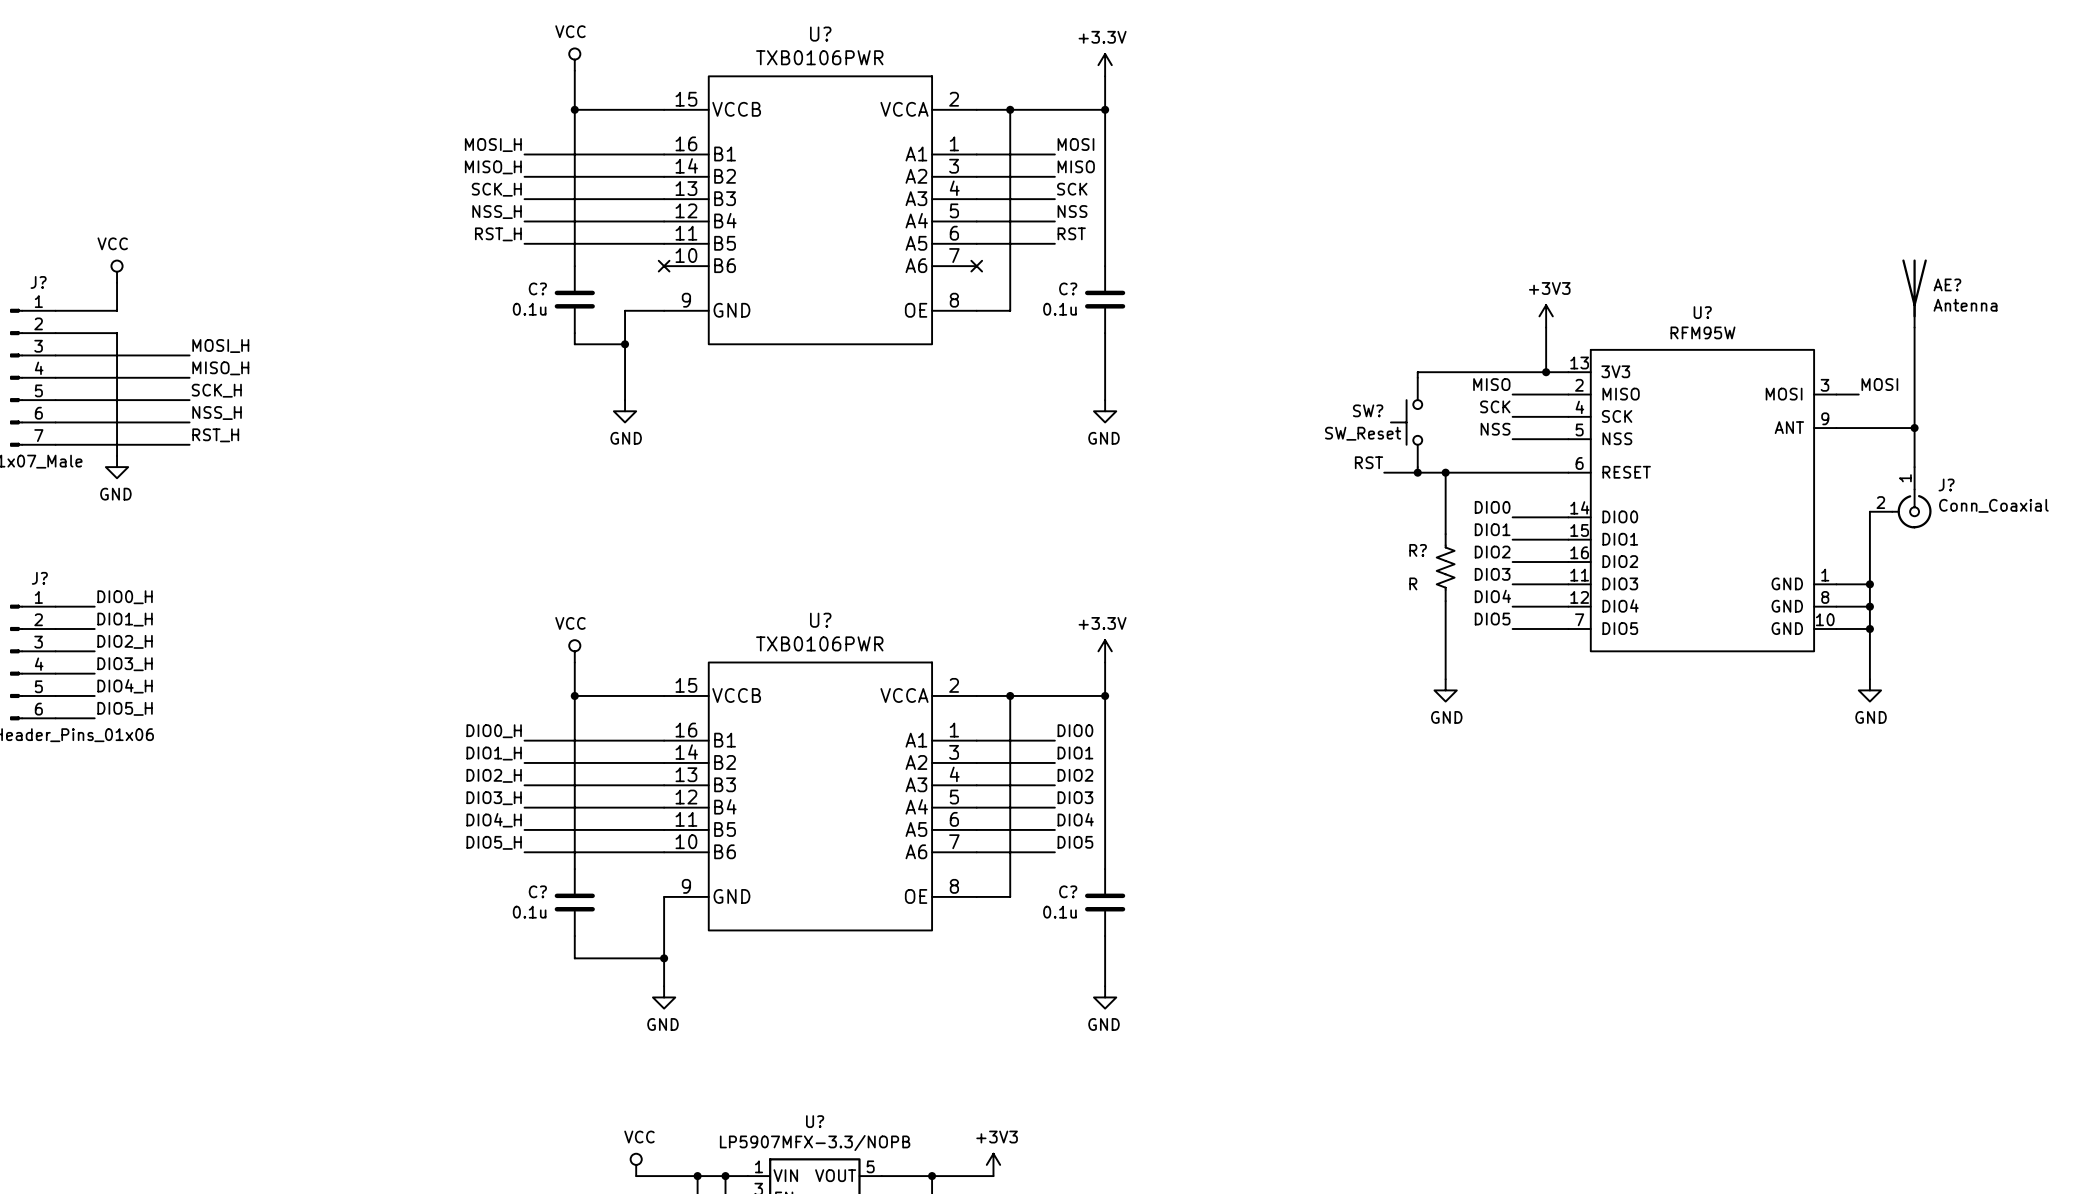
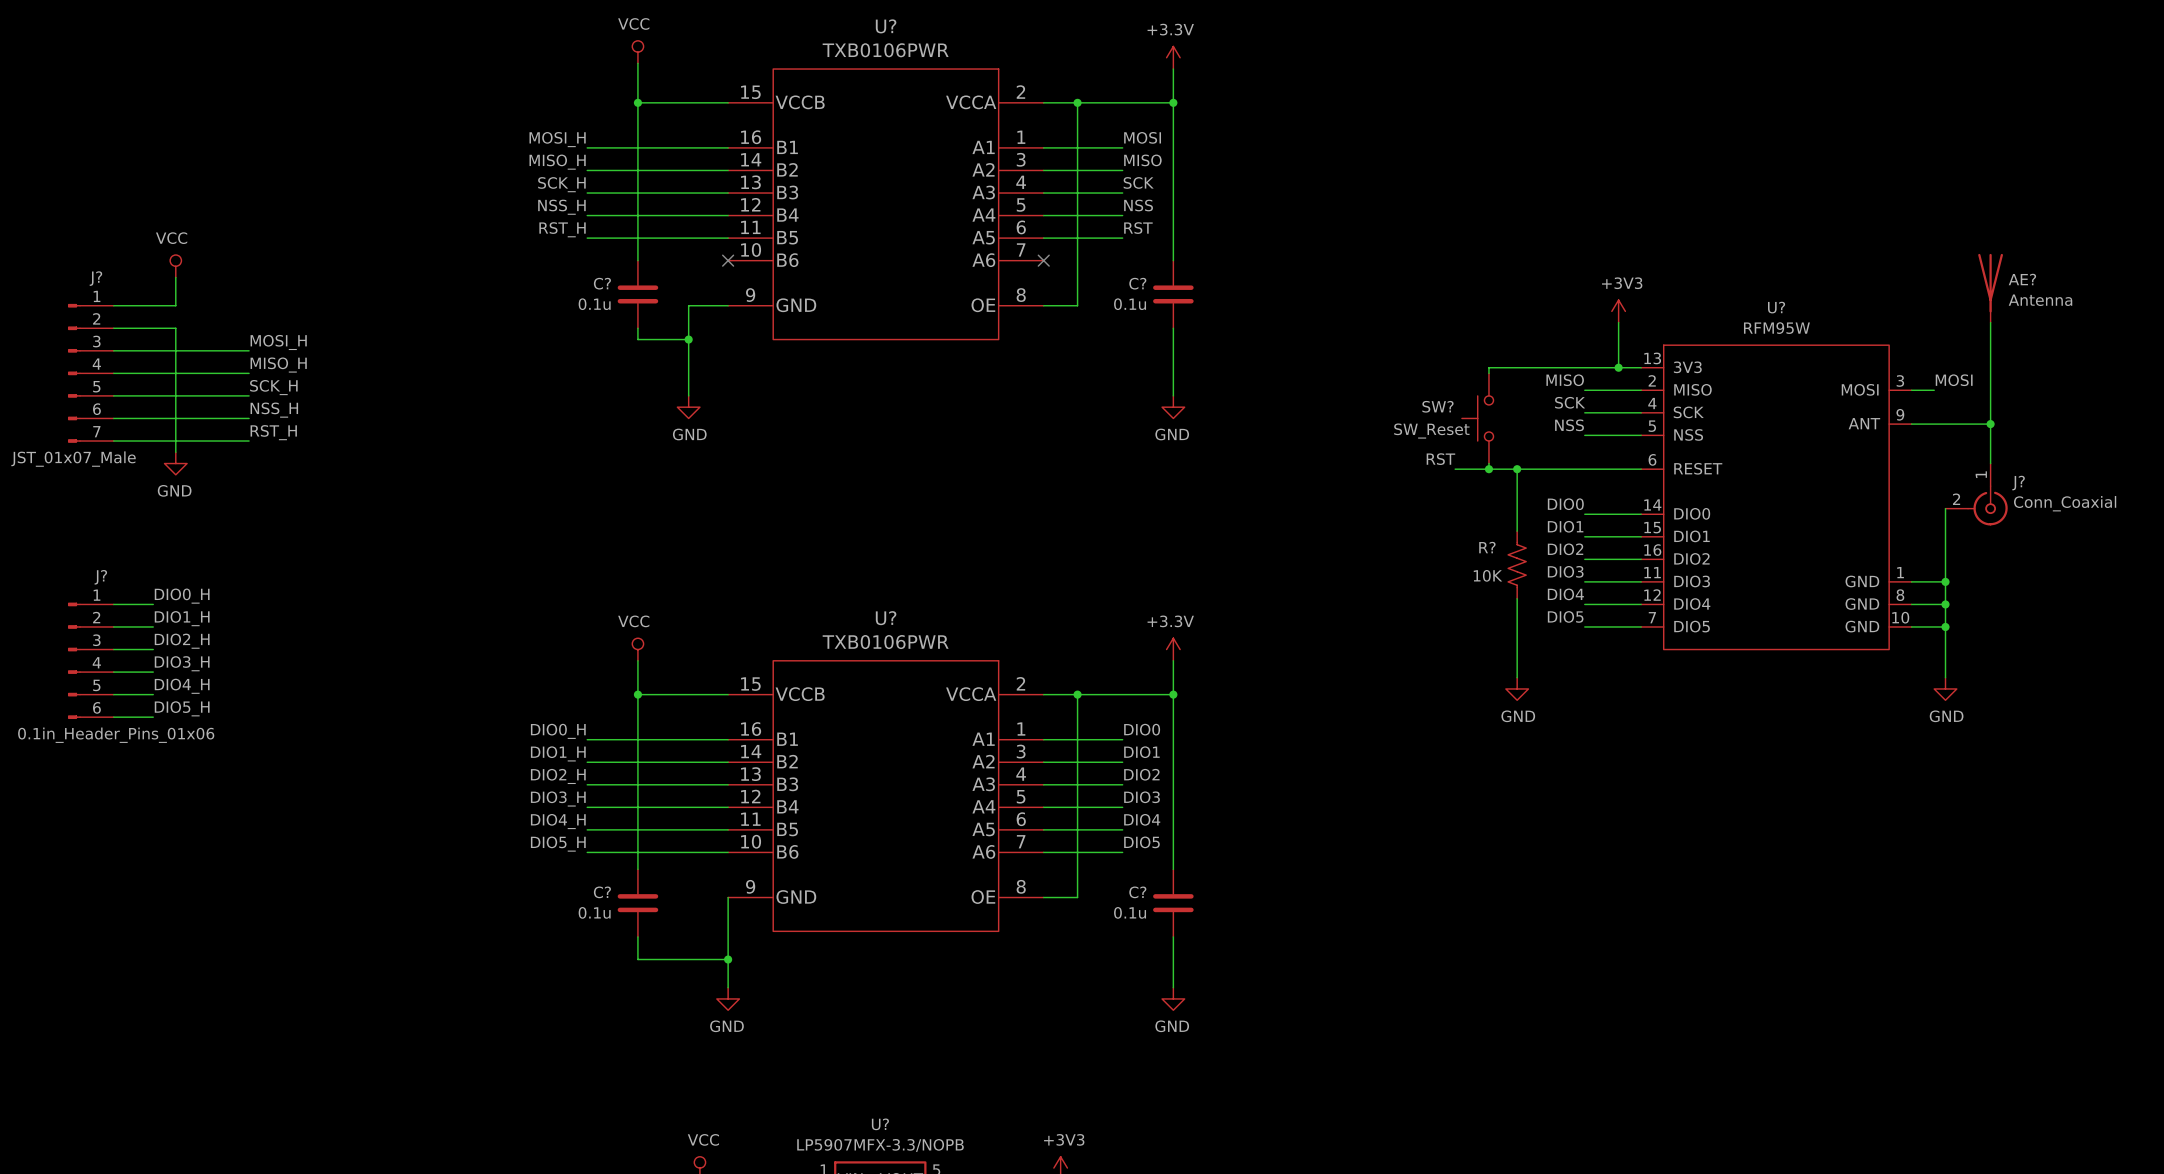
R? value: R (1413, 583) -> 10K (1487, 575)

